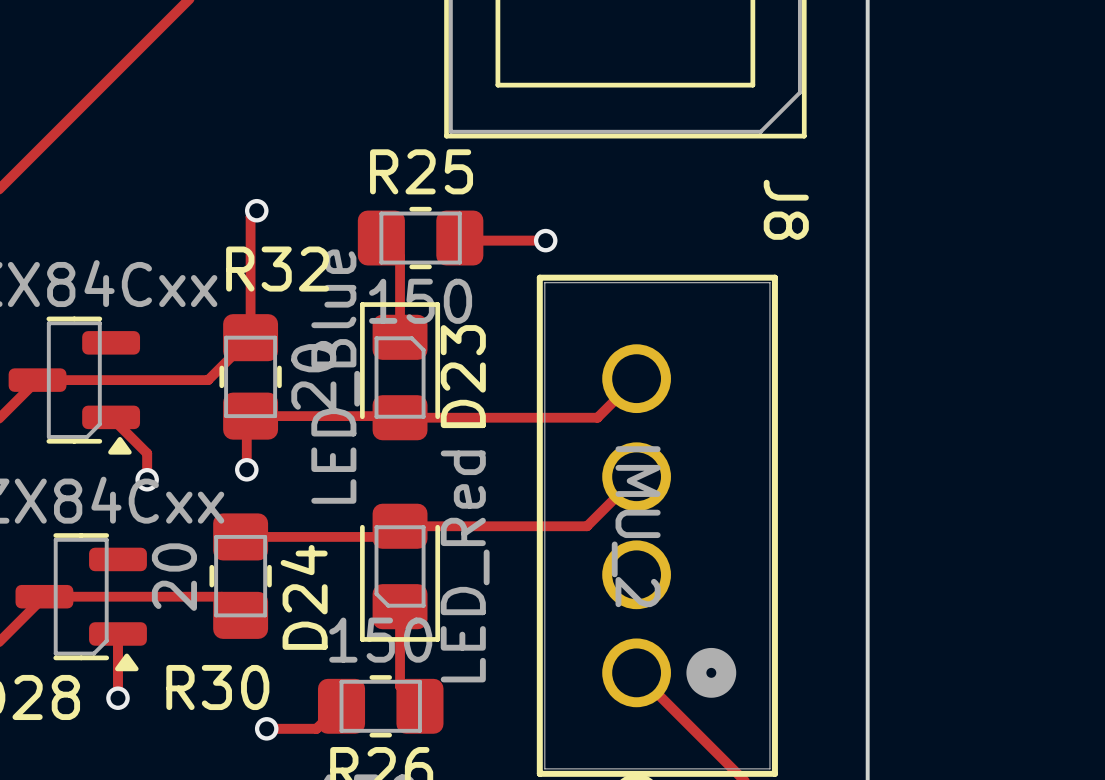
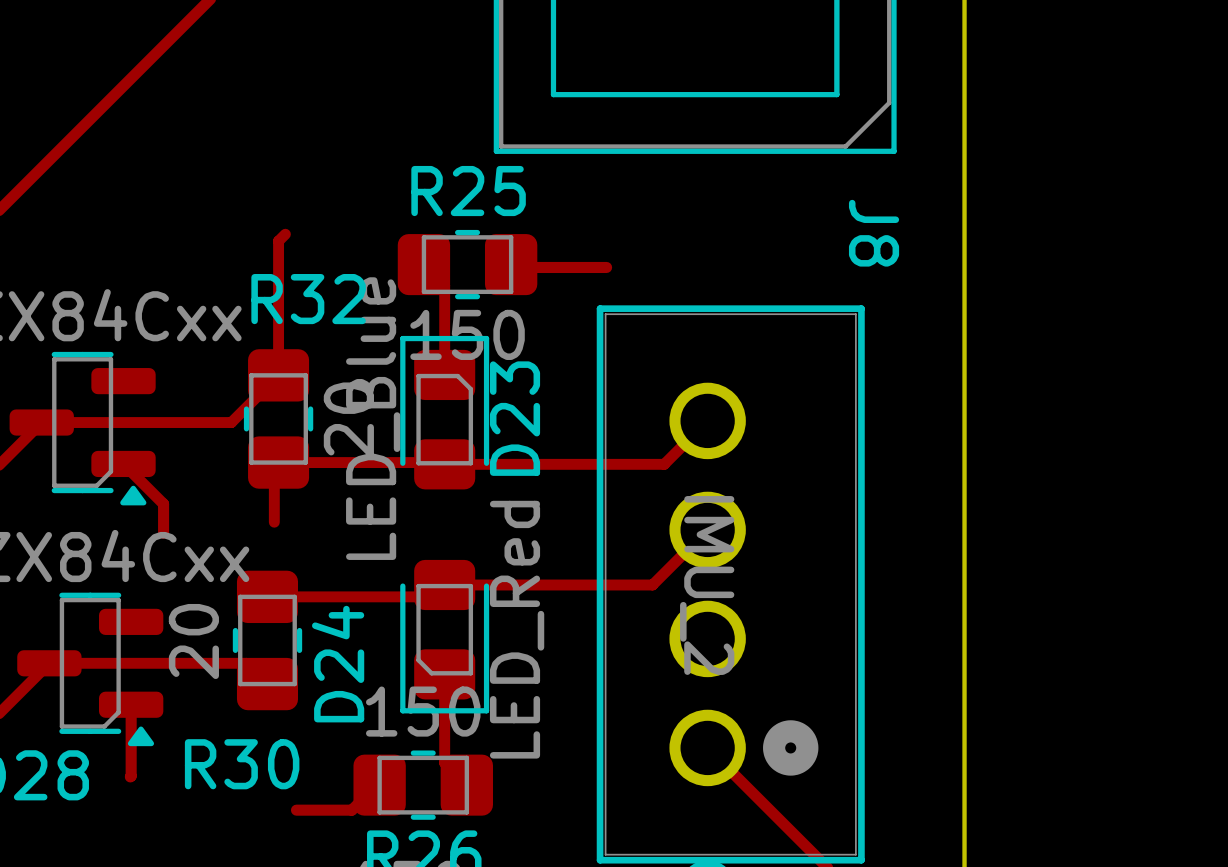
via: (256, 210) -> none
via: (545, 240) -> none
via: (246, 469) -> none
via: (147, 479) -> none
via: (117, 698) -> none
via: (266, 728) -> none

